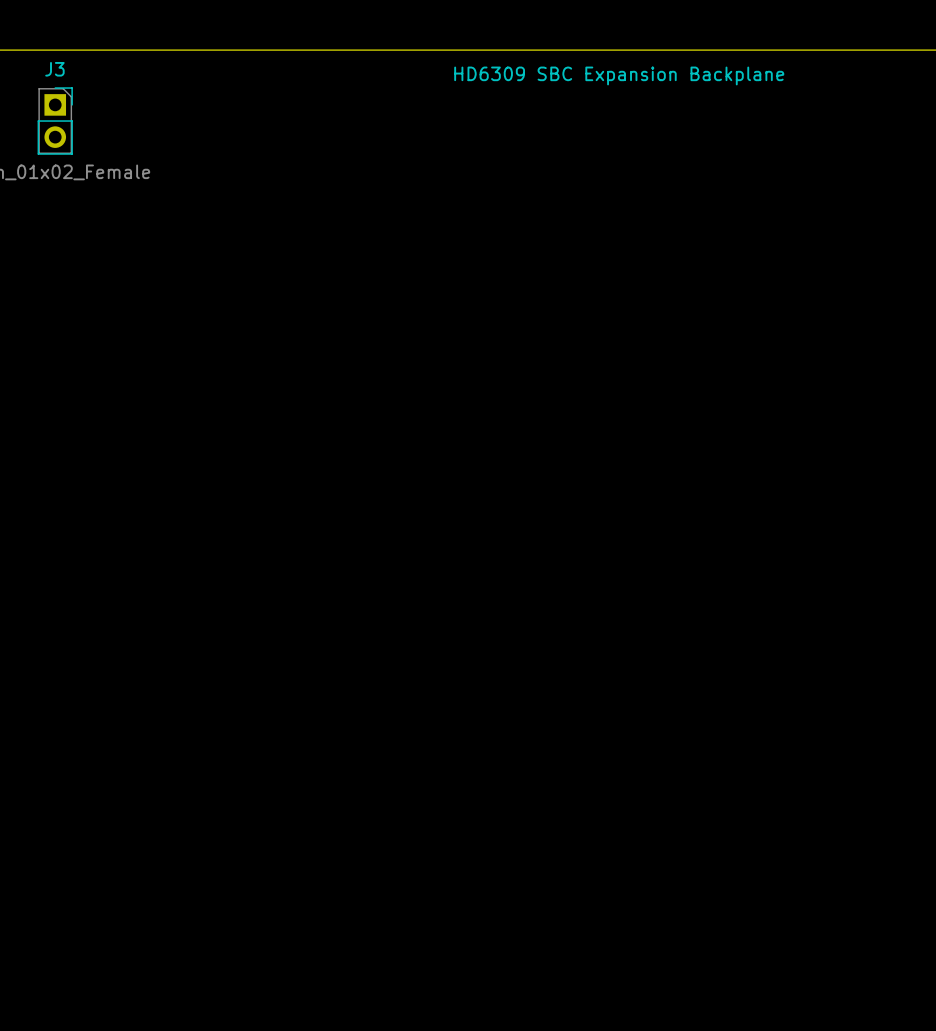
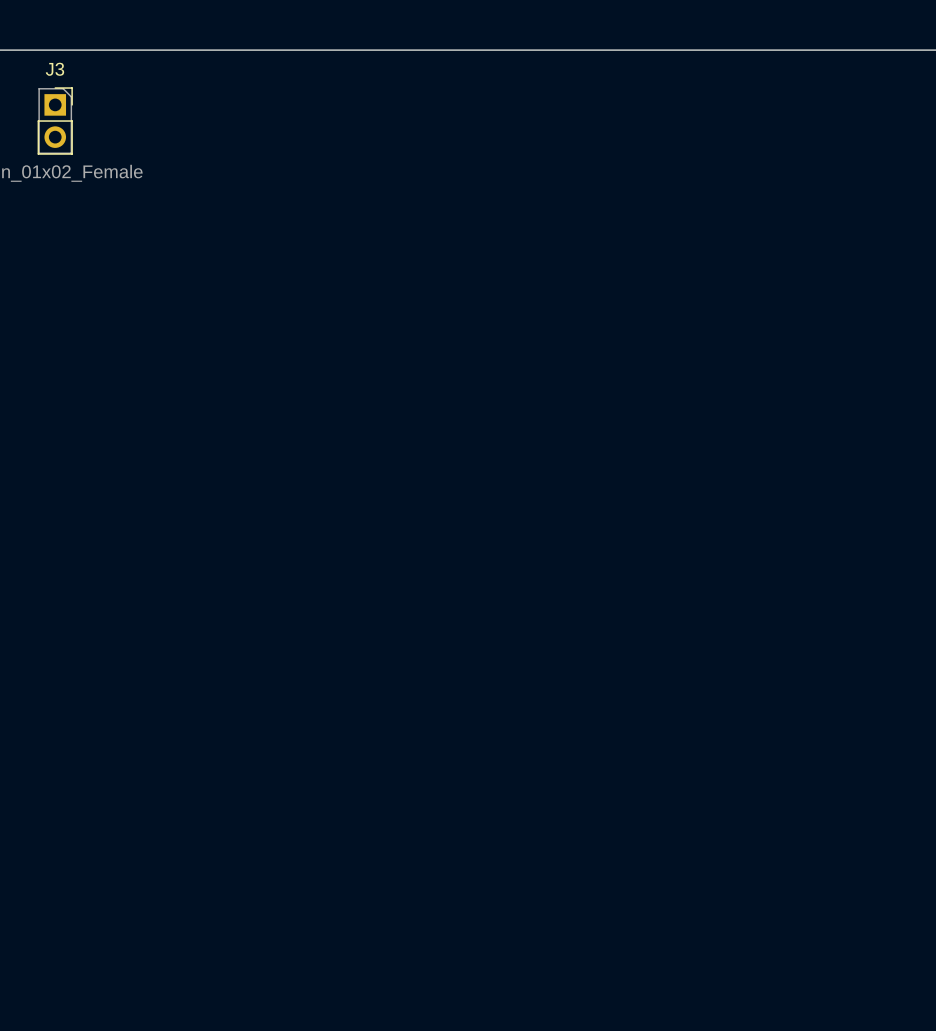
text: HD6309 SBC Expansion Backplane (619, 75) -> none

